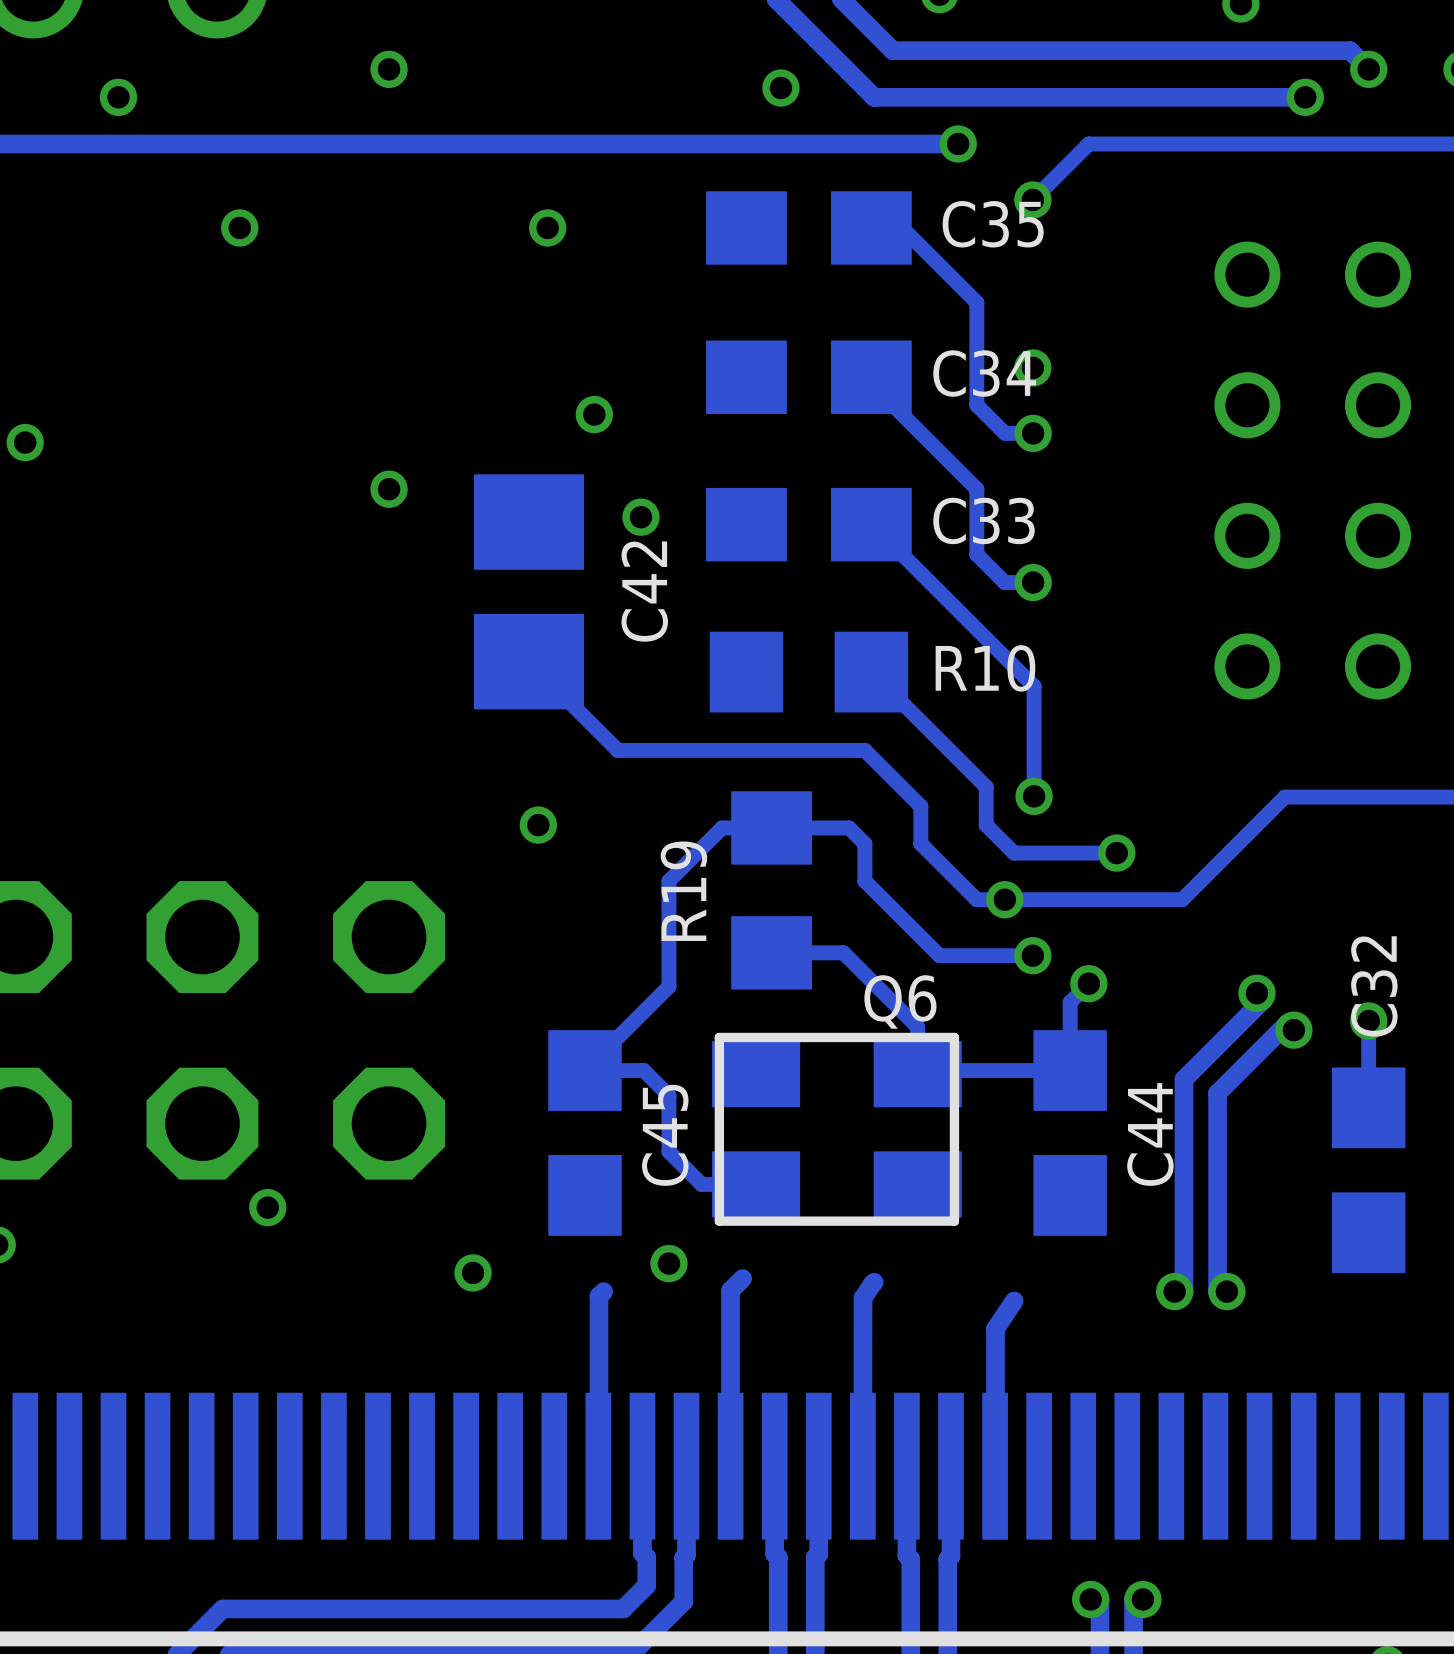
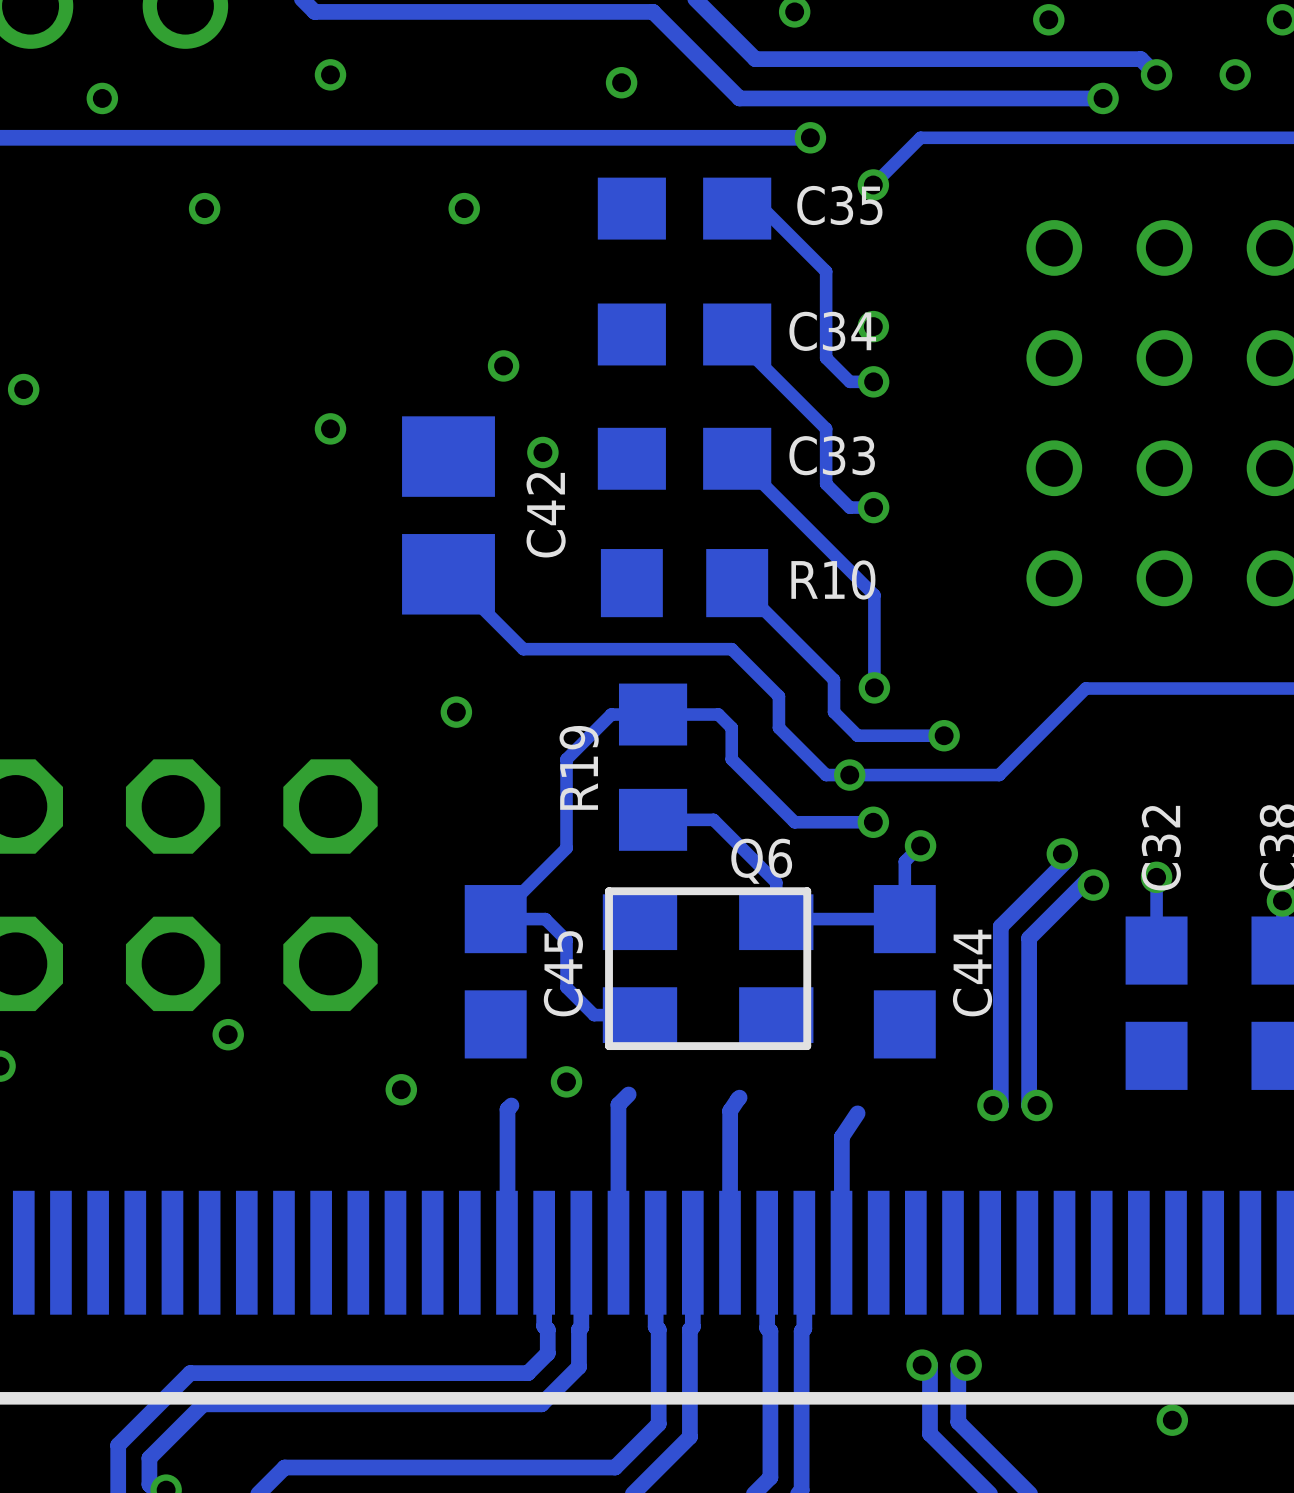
via position: (780, 88) -> (621, 82)

